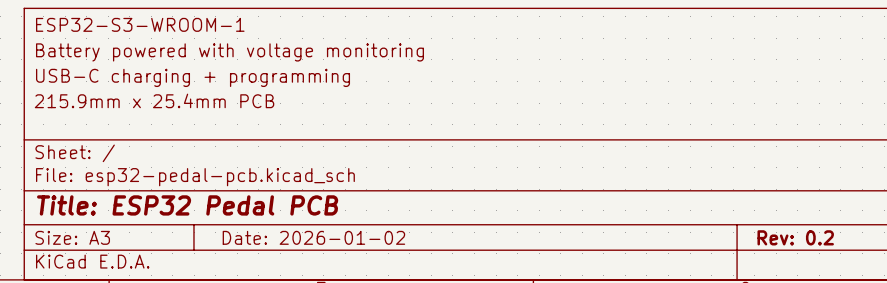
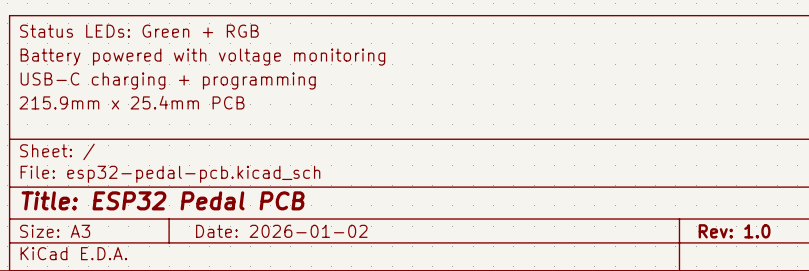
title block: ESP32-S3-WROOM-1 (140, 24) -> Status LEDs: Green + RGB (139, 31)
title block: Rev: 0.2 (795, 237) -> Rev: 1.0 (734, 231)

